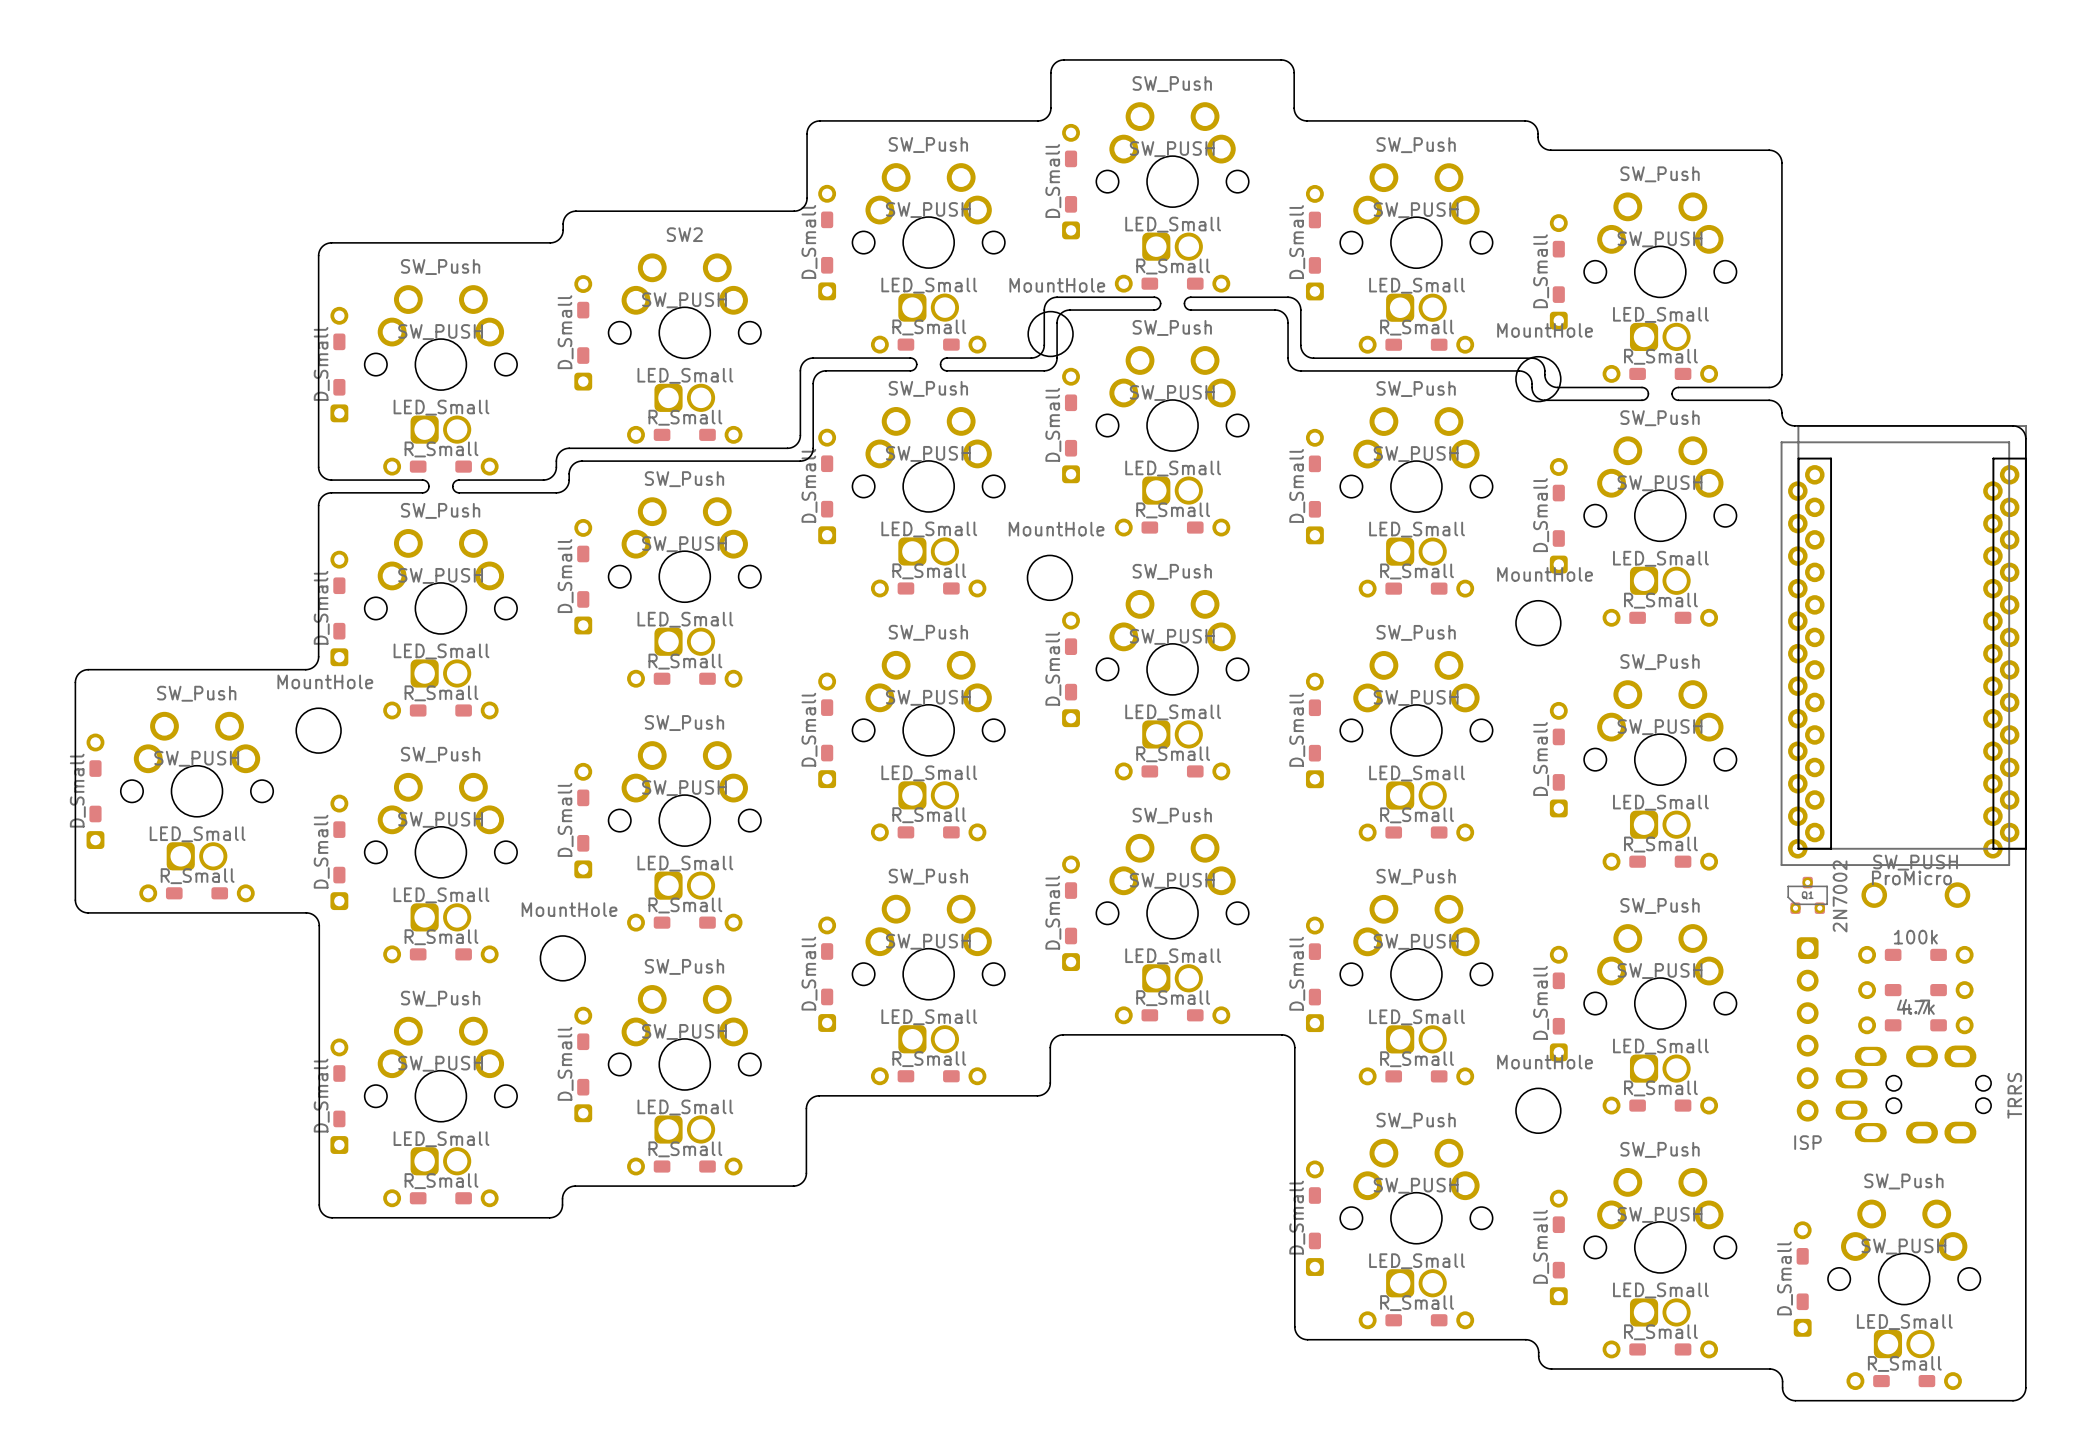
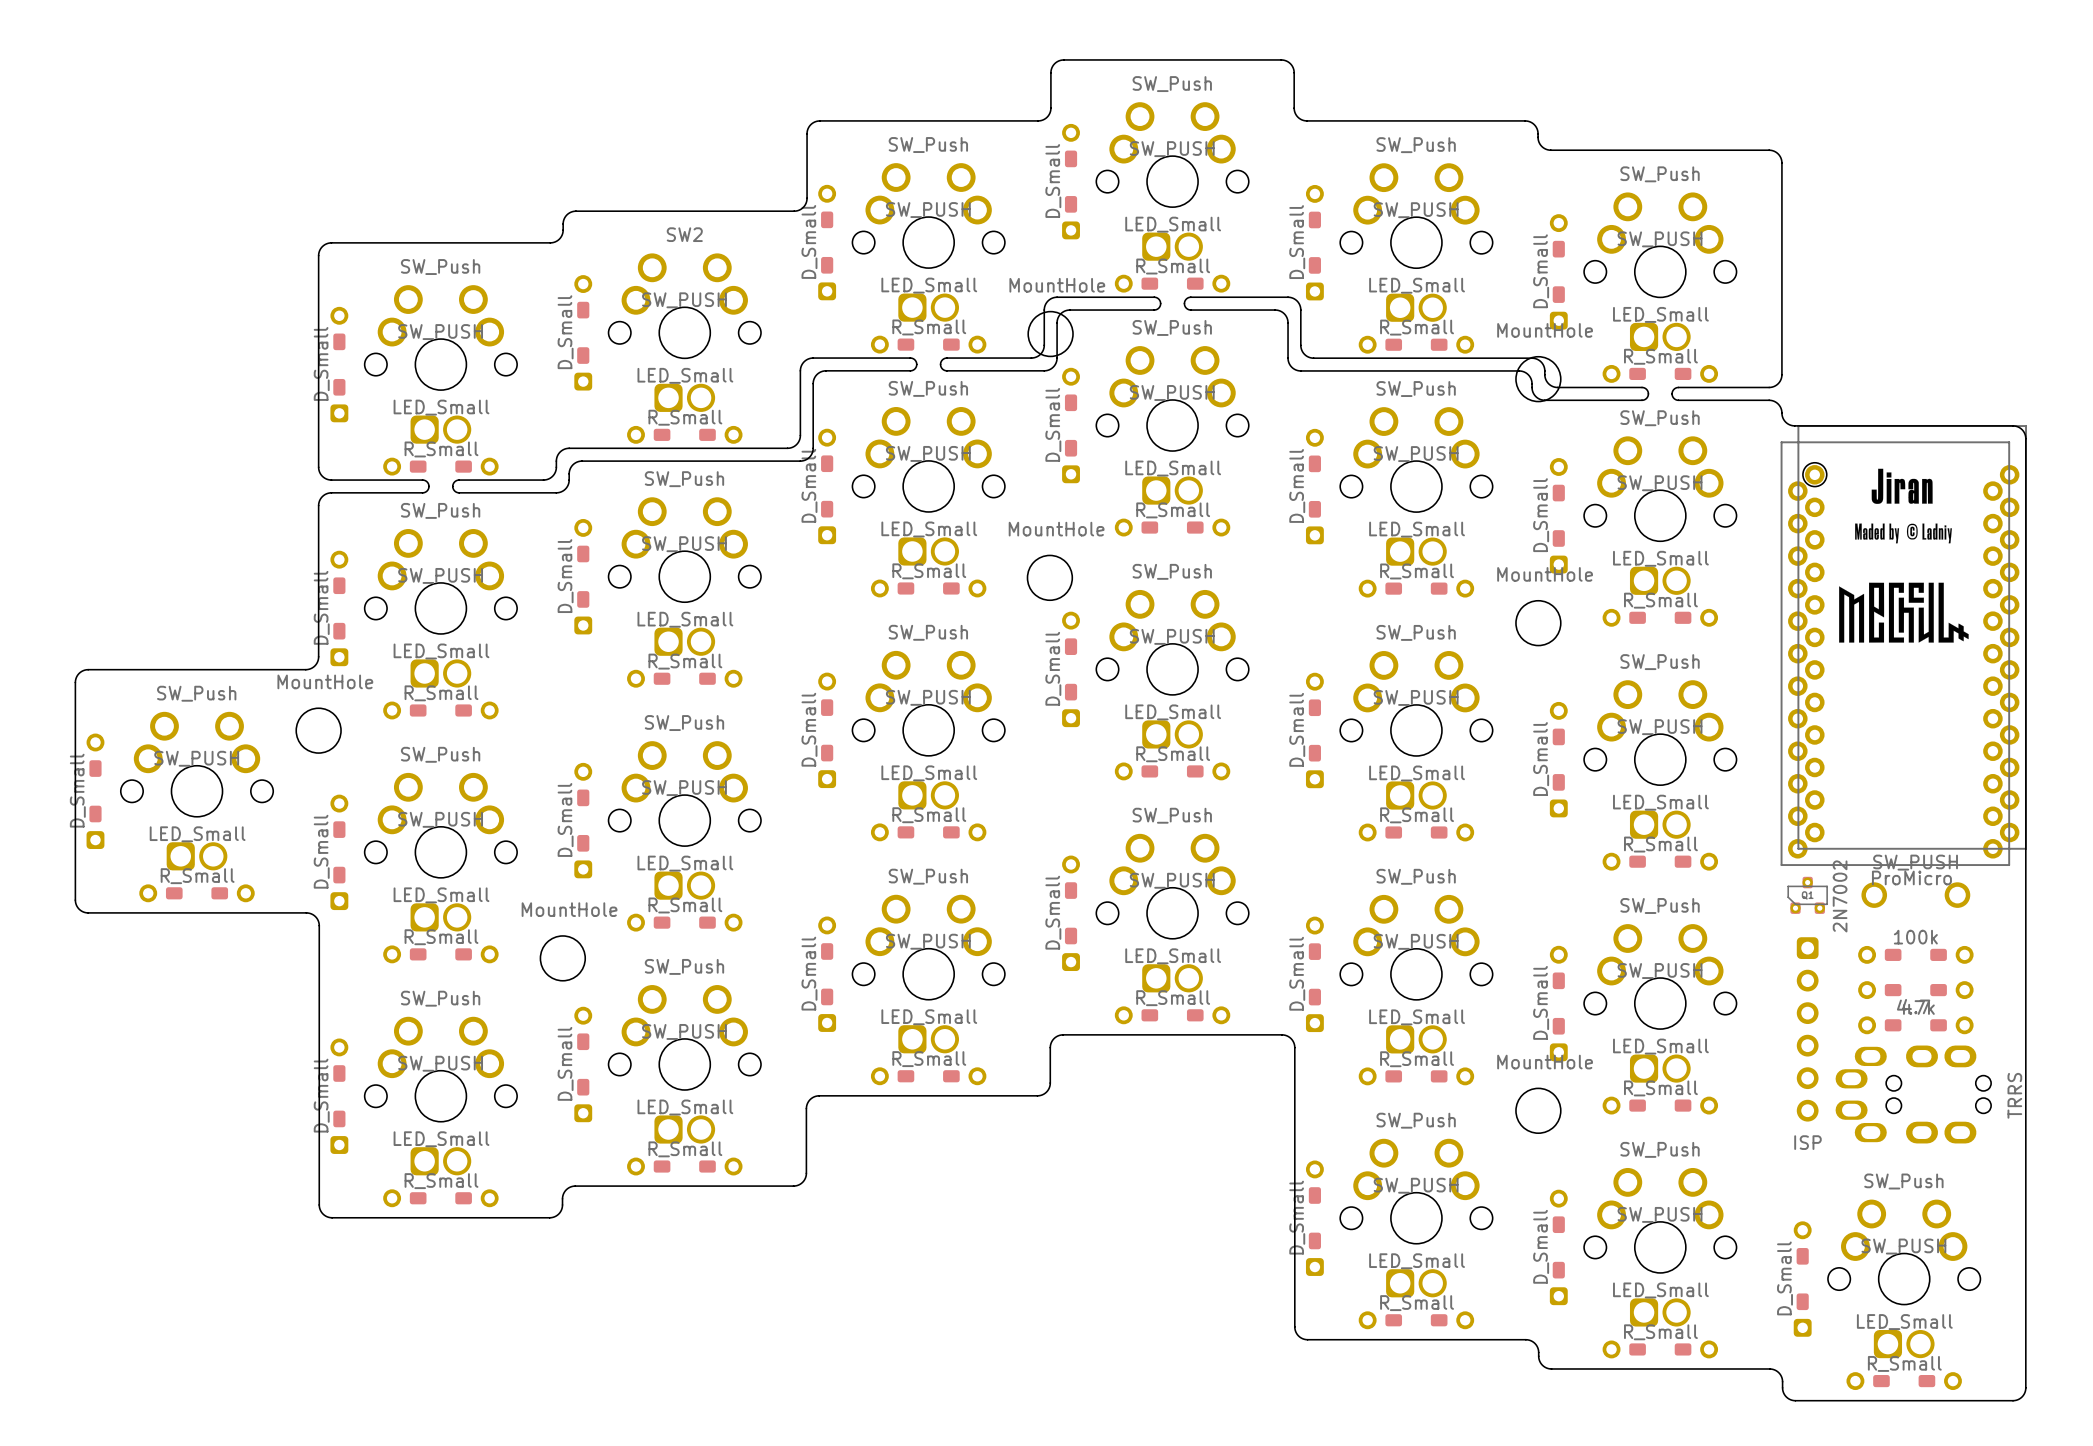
part footprint: [1780, 425, 2027, 867] -> [1780, 425, 2027, 867]
drawing: none -> [1839, 468, 1969, 643]

